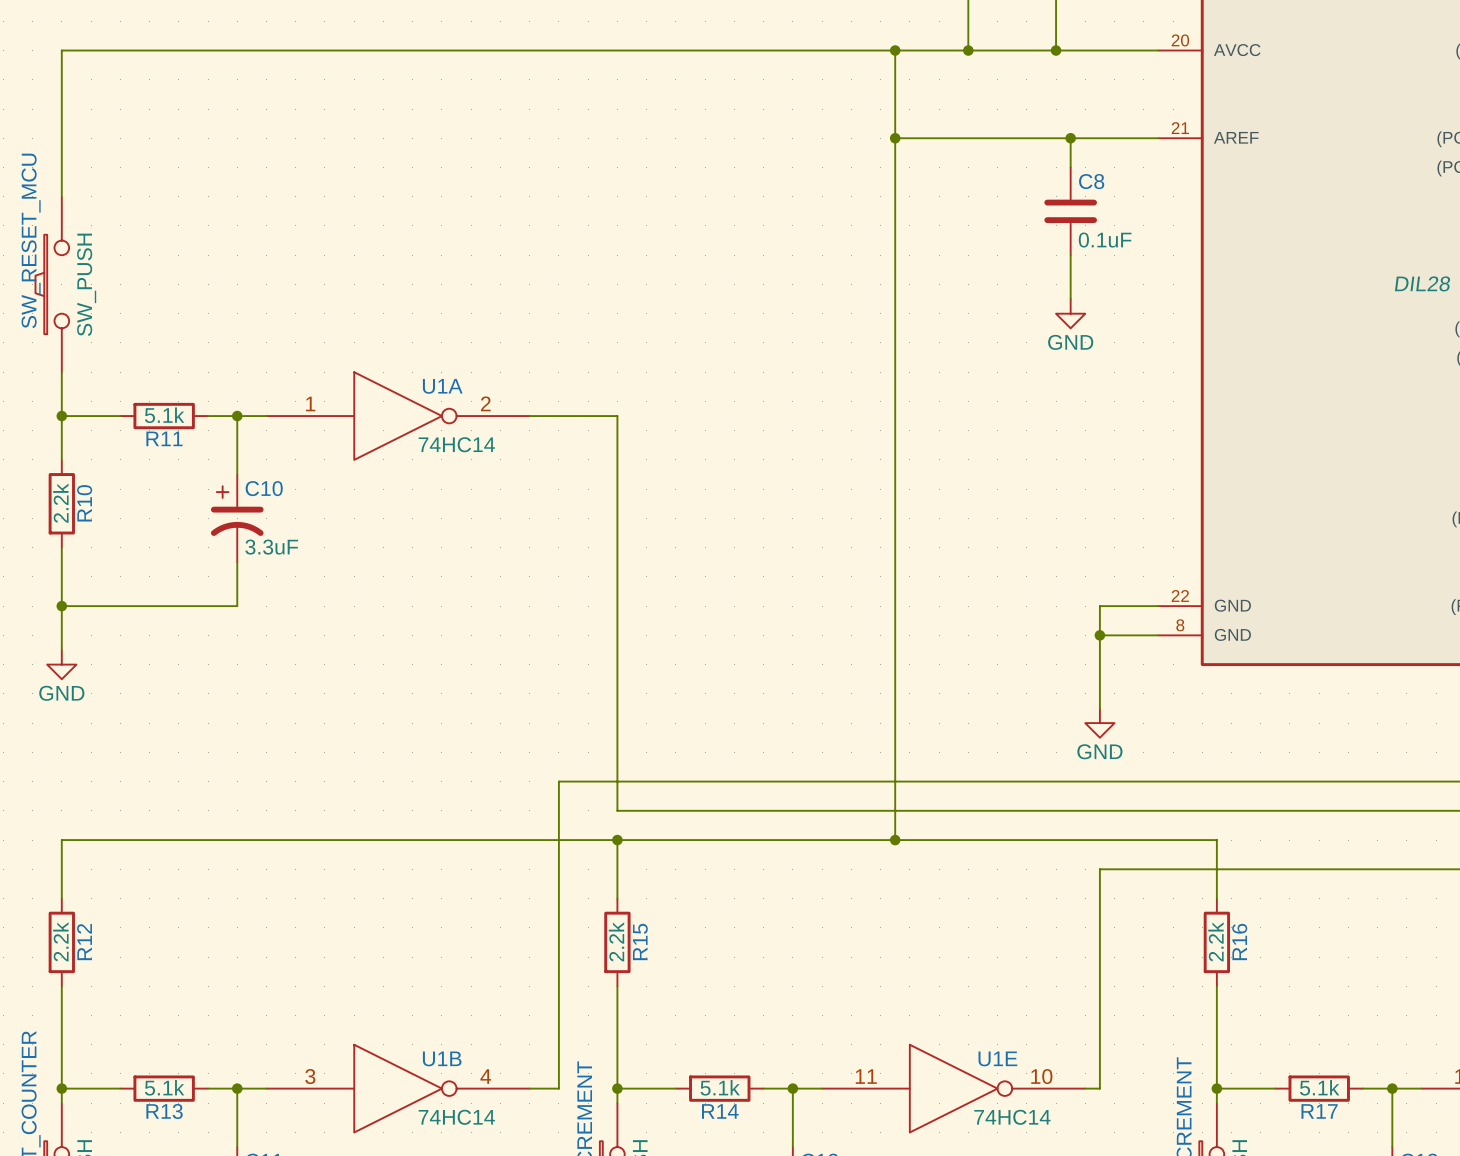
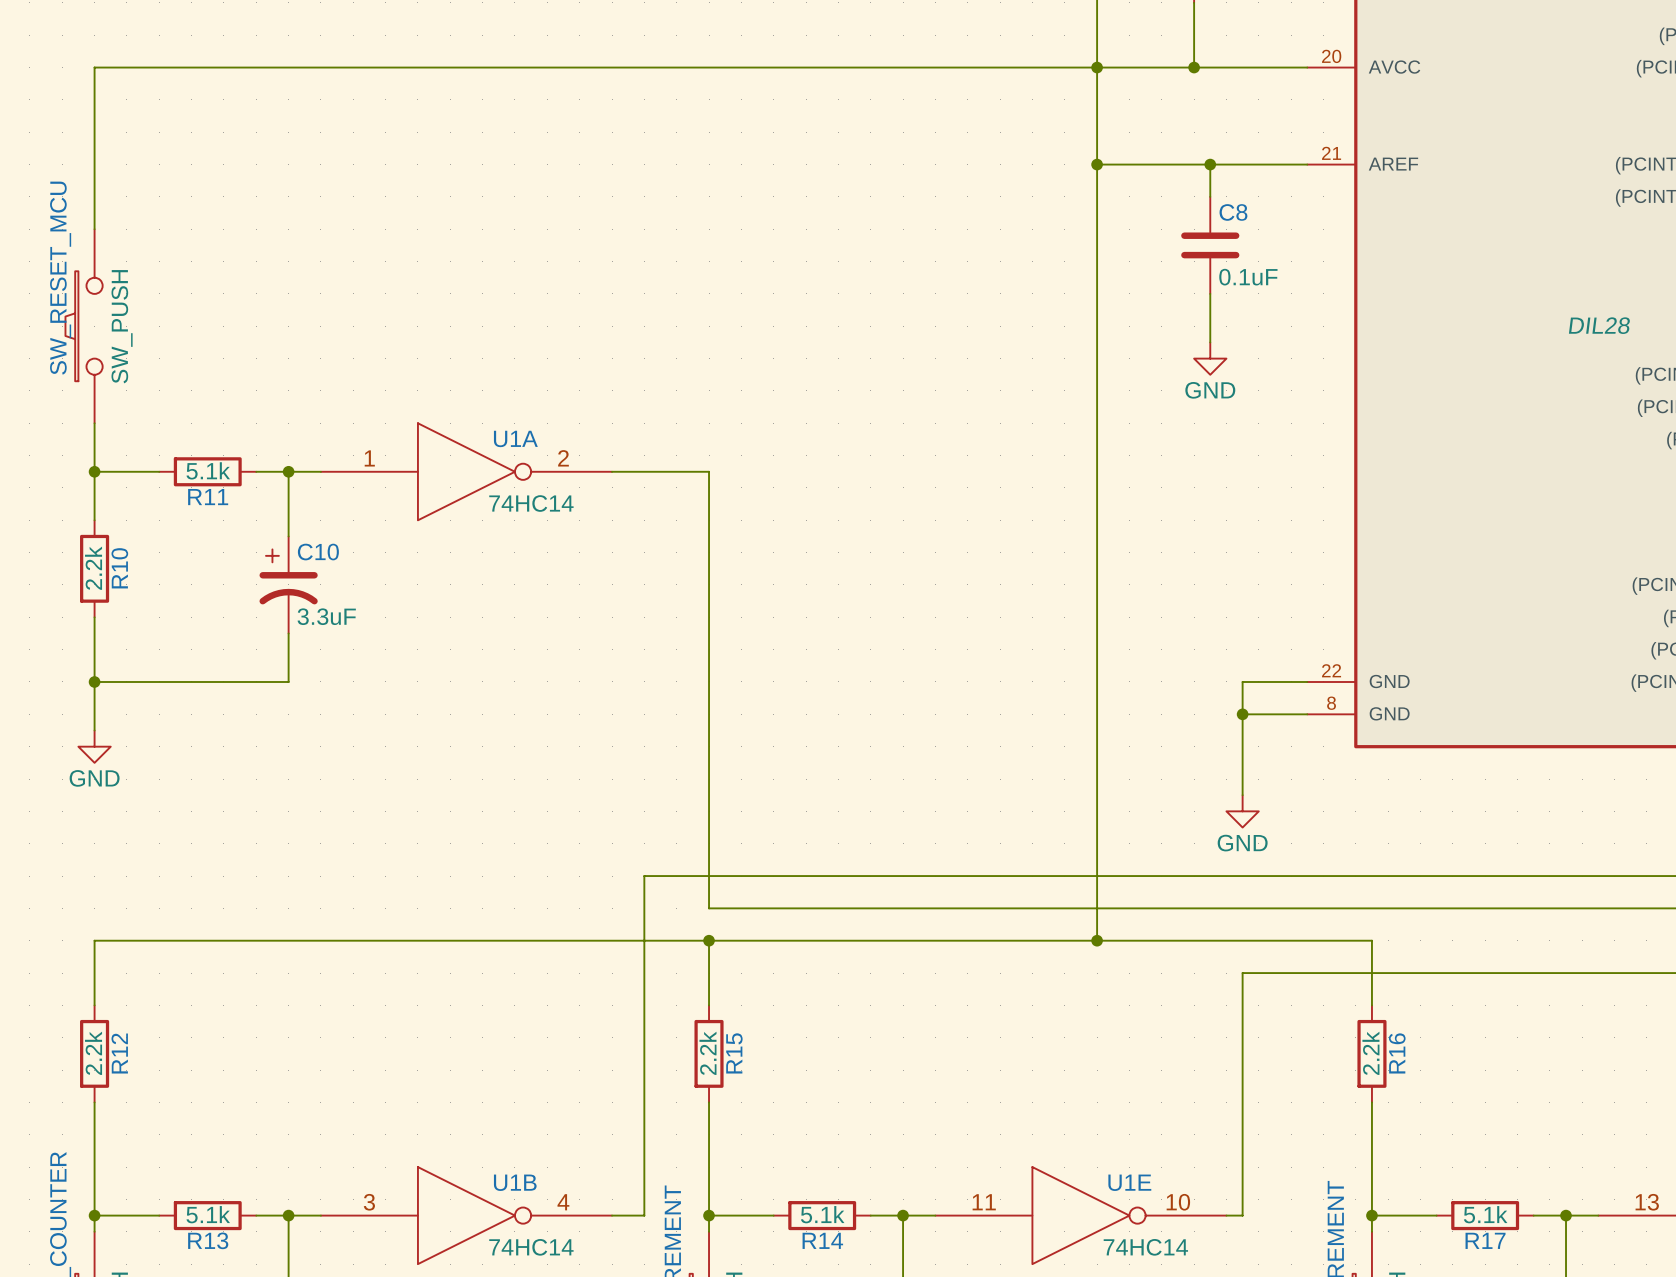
wire: (895, 50) (895, 840) -> (1097, 67) (1097, 940)
junction: (895, 50) -> none
wire: (895, 138) (968, 138) -> none
junction: (895, 138) -> none
junction: none -> (1097, 164)
junction: (895, 840) -> none
junction: none -> (1097, 940)

